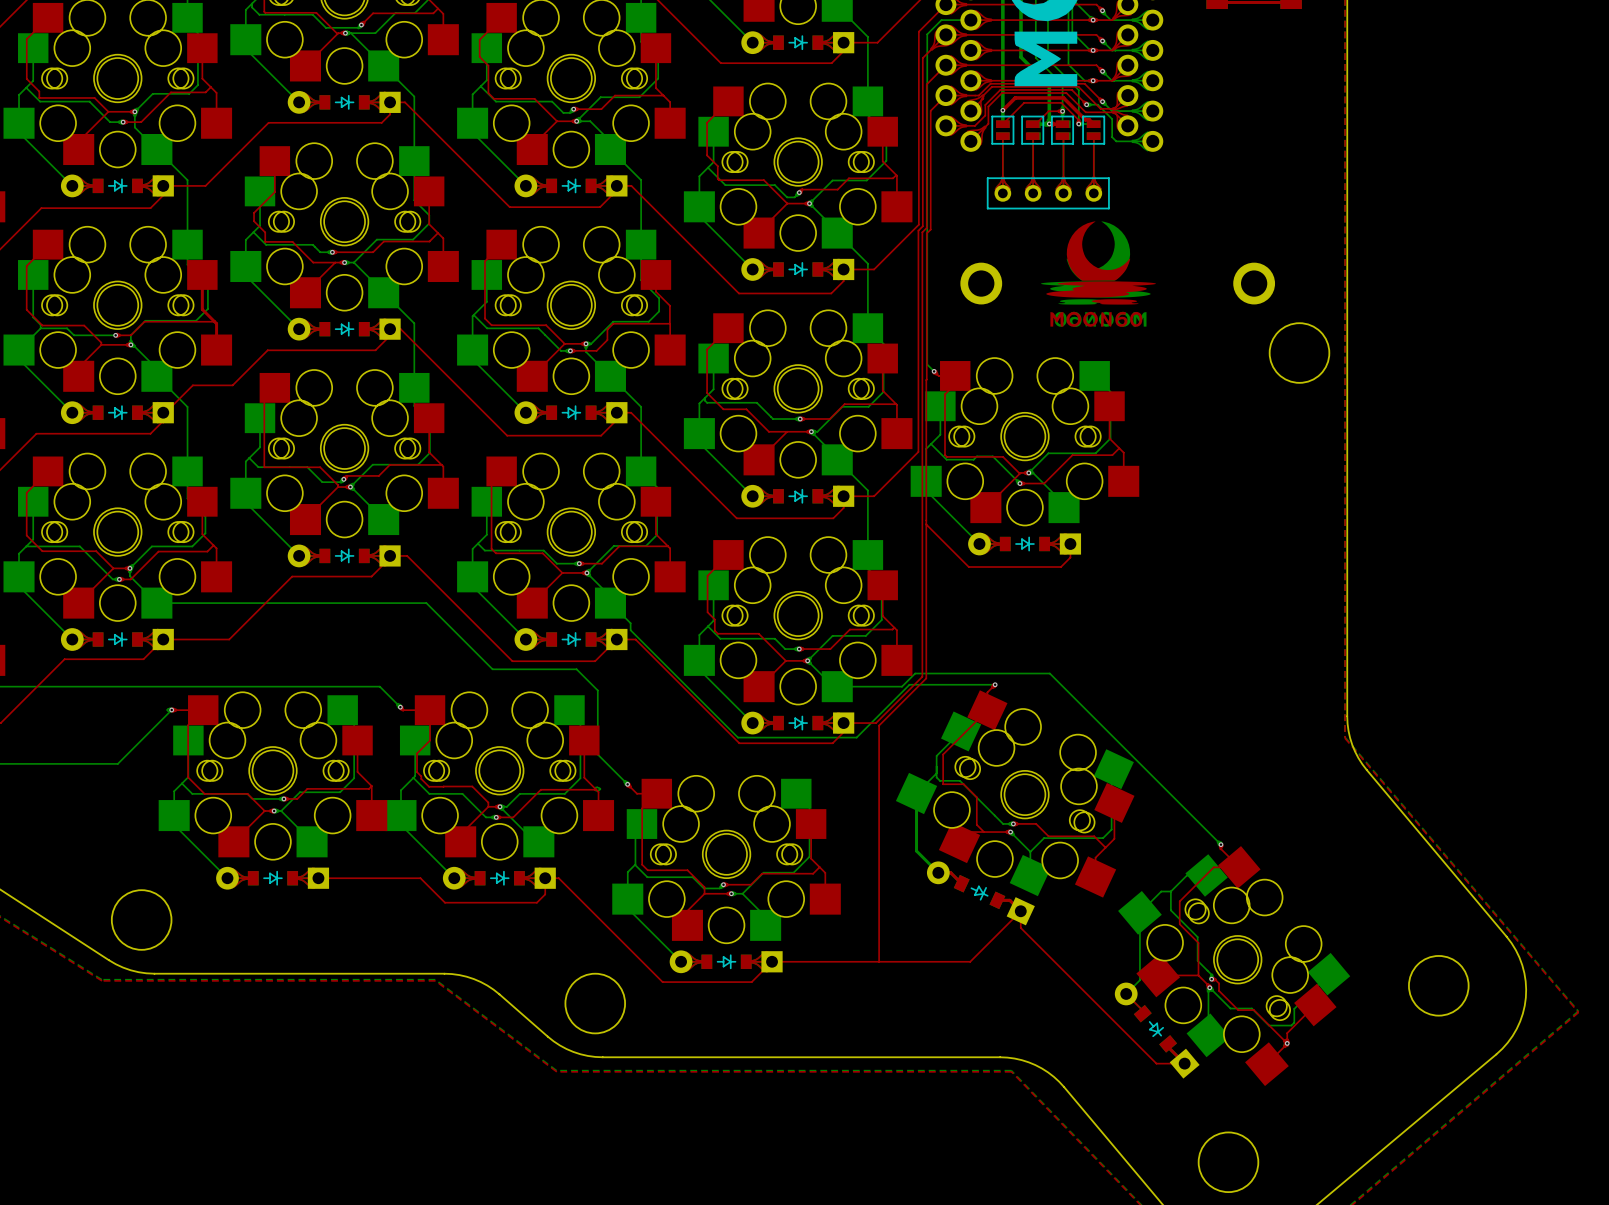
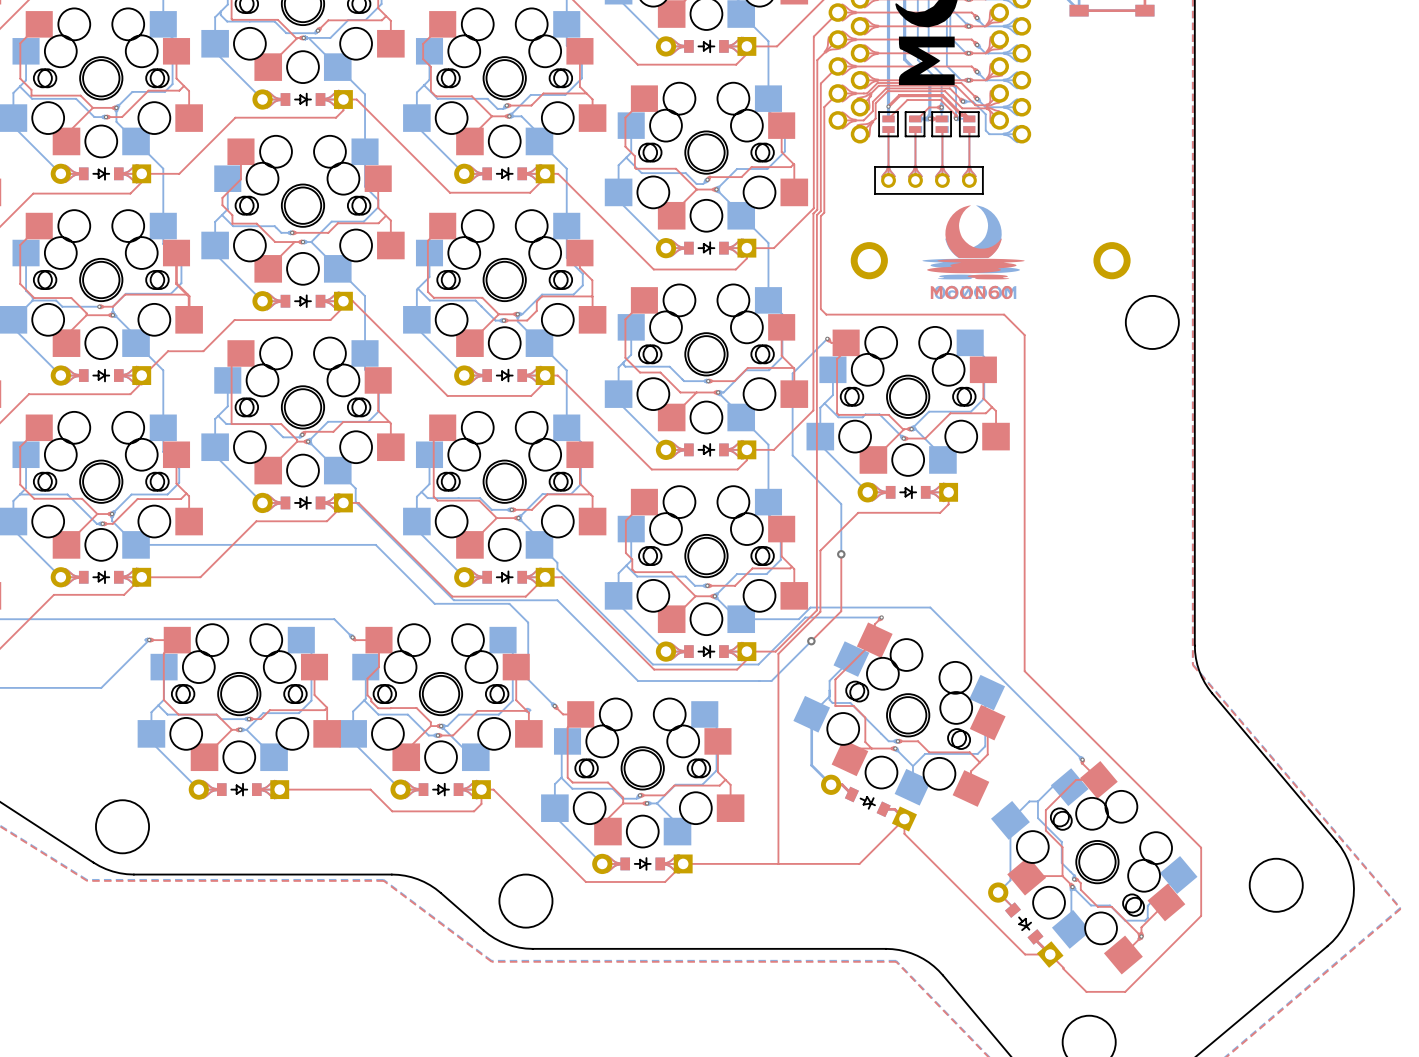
bottom track: (970, 20) (941, 20) (927, 34) (927, 364) (934, 371) -> (841, 554) (841, 504) (792, 455) (792, 373) (827, 338)
top track: (926, 338) (926, 609) -> (820, 309) (826, 314) (1004, 314) (1024, 335) (1024, 671) (1201, 847) (1201, 915) (1125, 991) (1086, 991) (1050, 954)
bottom track: none -> (337, 470) (355, 488) (355, 502) (453, 600) (557, 600) (638, 680) (771, 680) (811, 641)
top track: (926, 524) (968, 567) -> (820, 550) (858, 512)
top track: none -> (841, 554) (841, 611) (811, 641)
via: none -> (841, 554)
via: none -> (811, 641)

